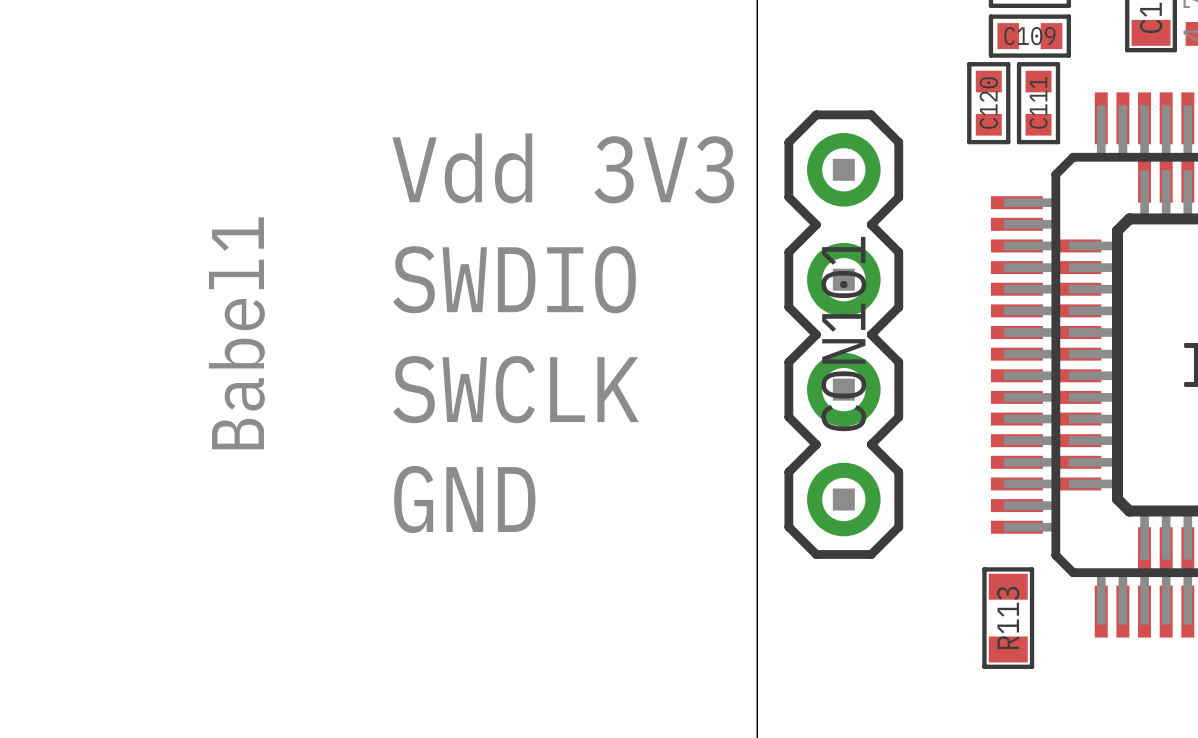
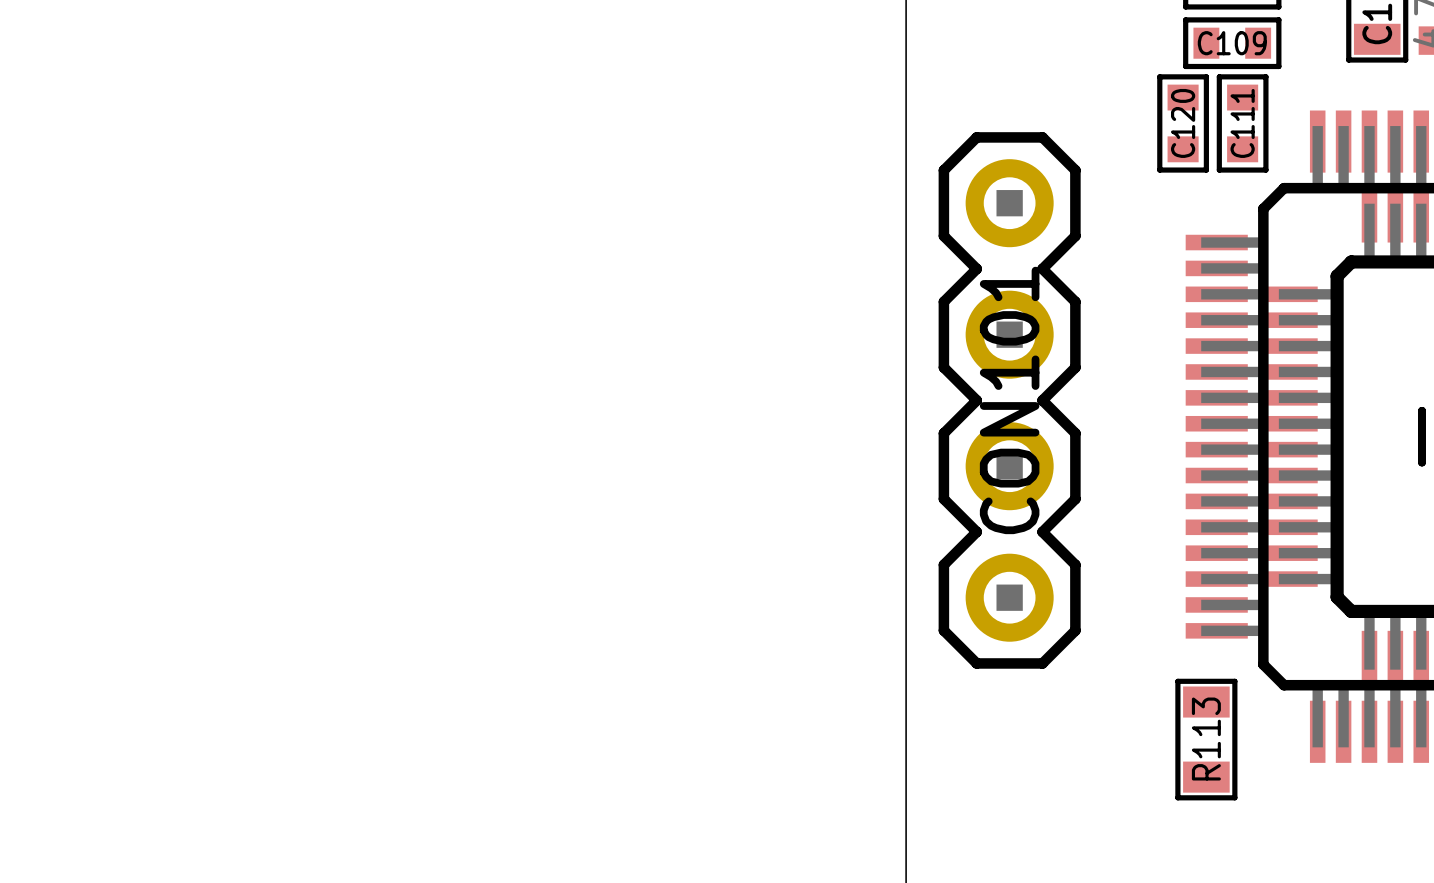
text: Vdd 3V3 (563, 168) -> none
text: SWDIO (514, 279) -> none
text: Babel1 (236, 333) -> none
text: SWCLK (515, 389) -> none
text: GND (464, 499) -> none

